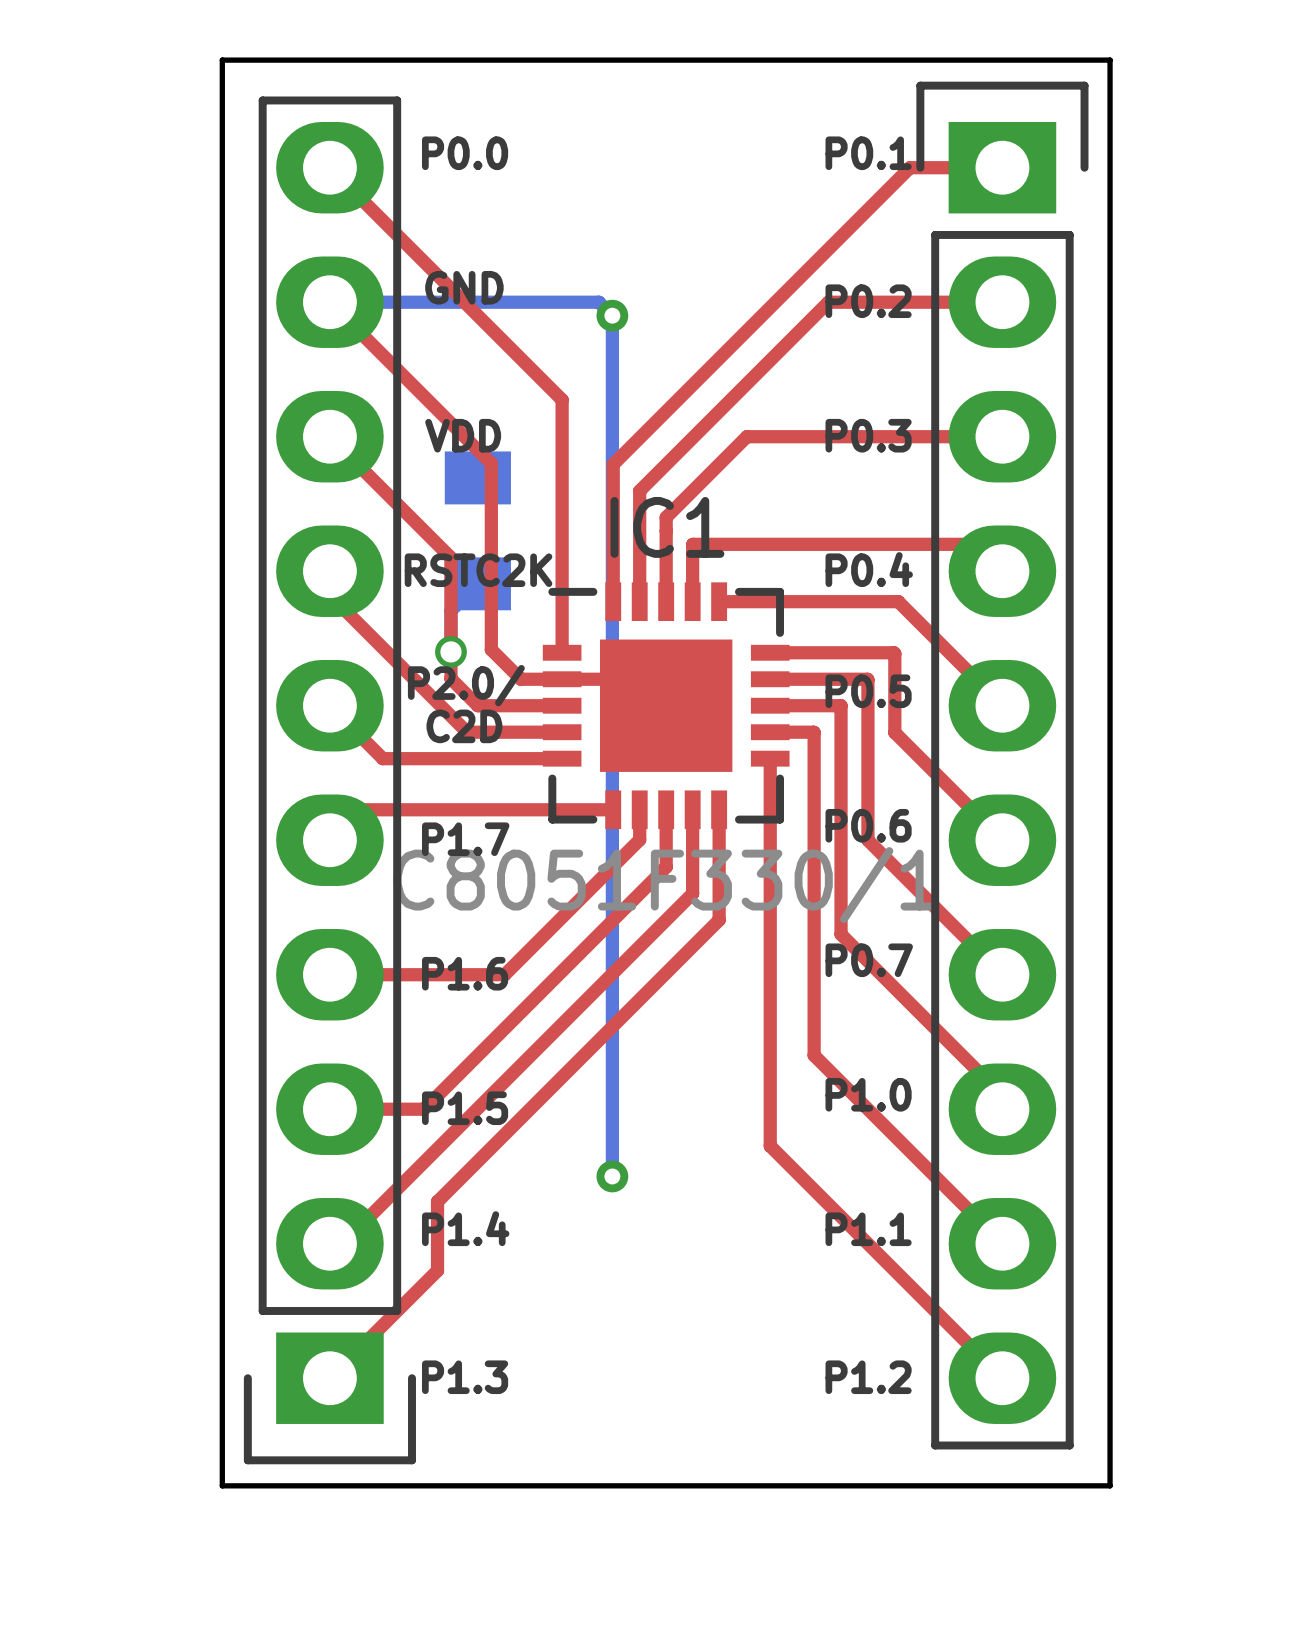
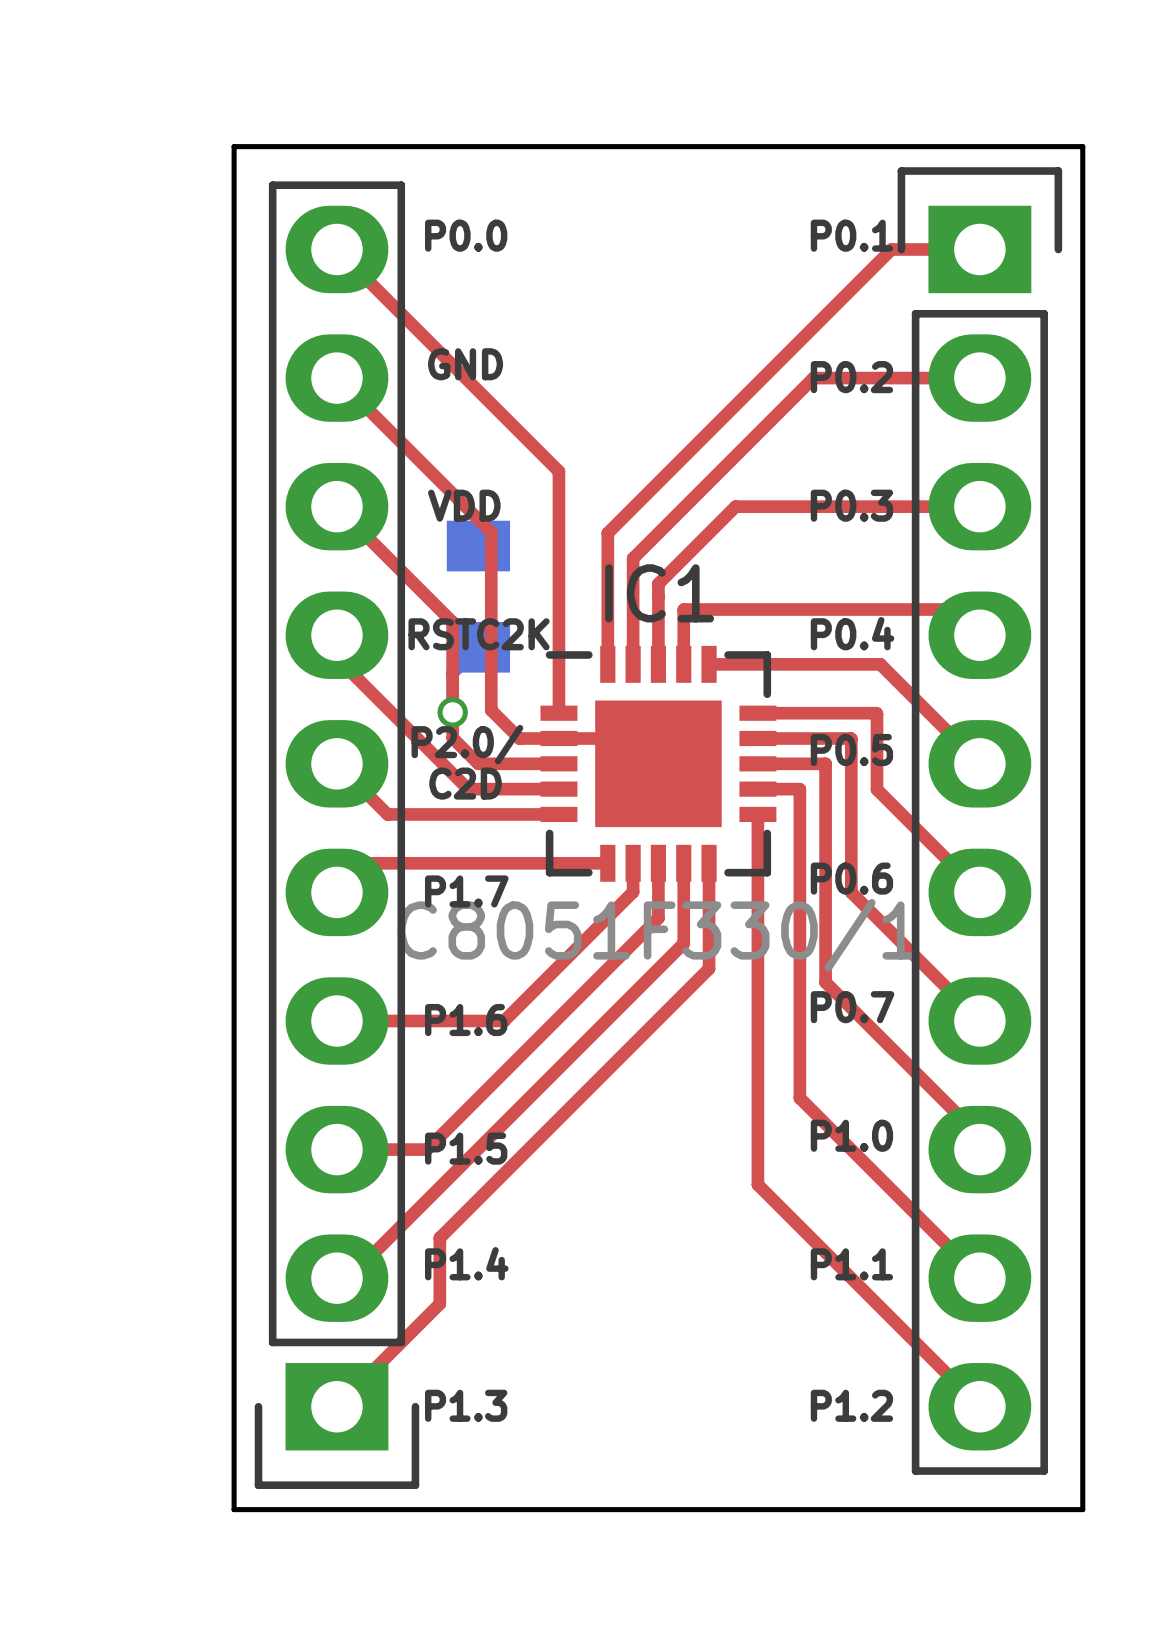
bottom track: (329, 302) (598, 302) (612, 315) (612, 1176) -> none
via: (612, 315) -> none
via: (612, 1176) -> none

